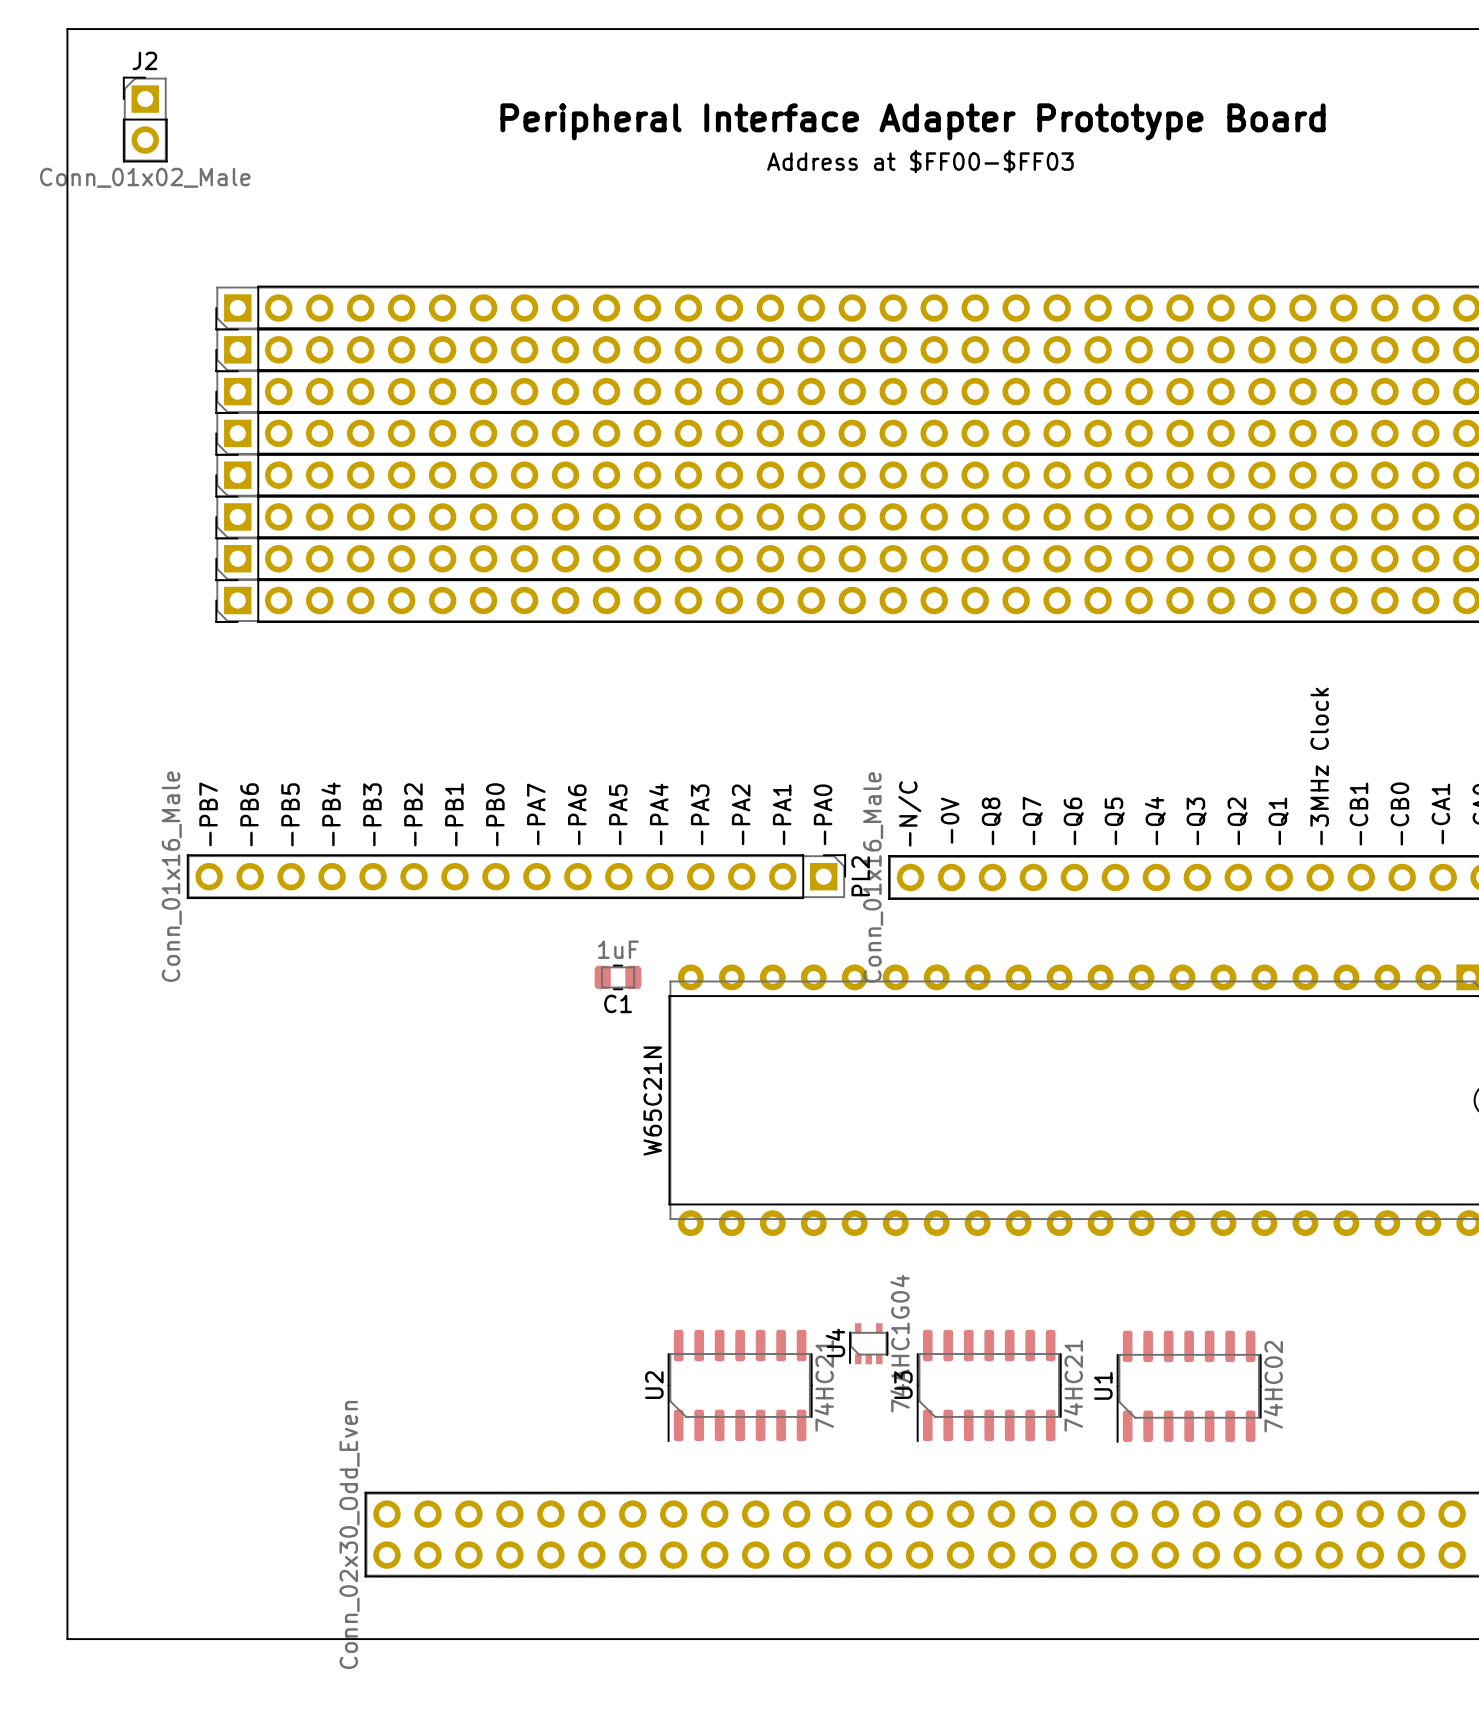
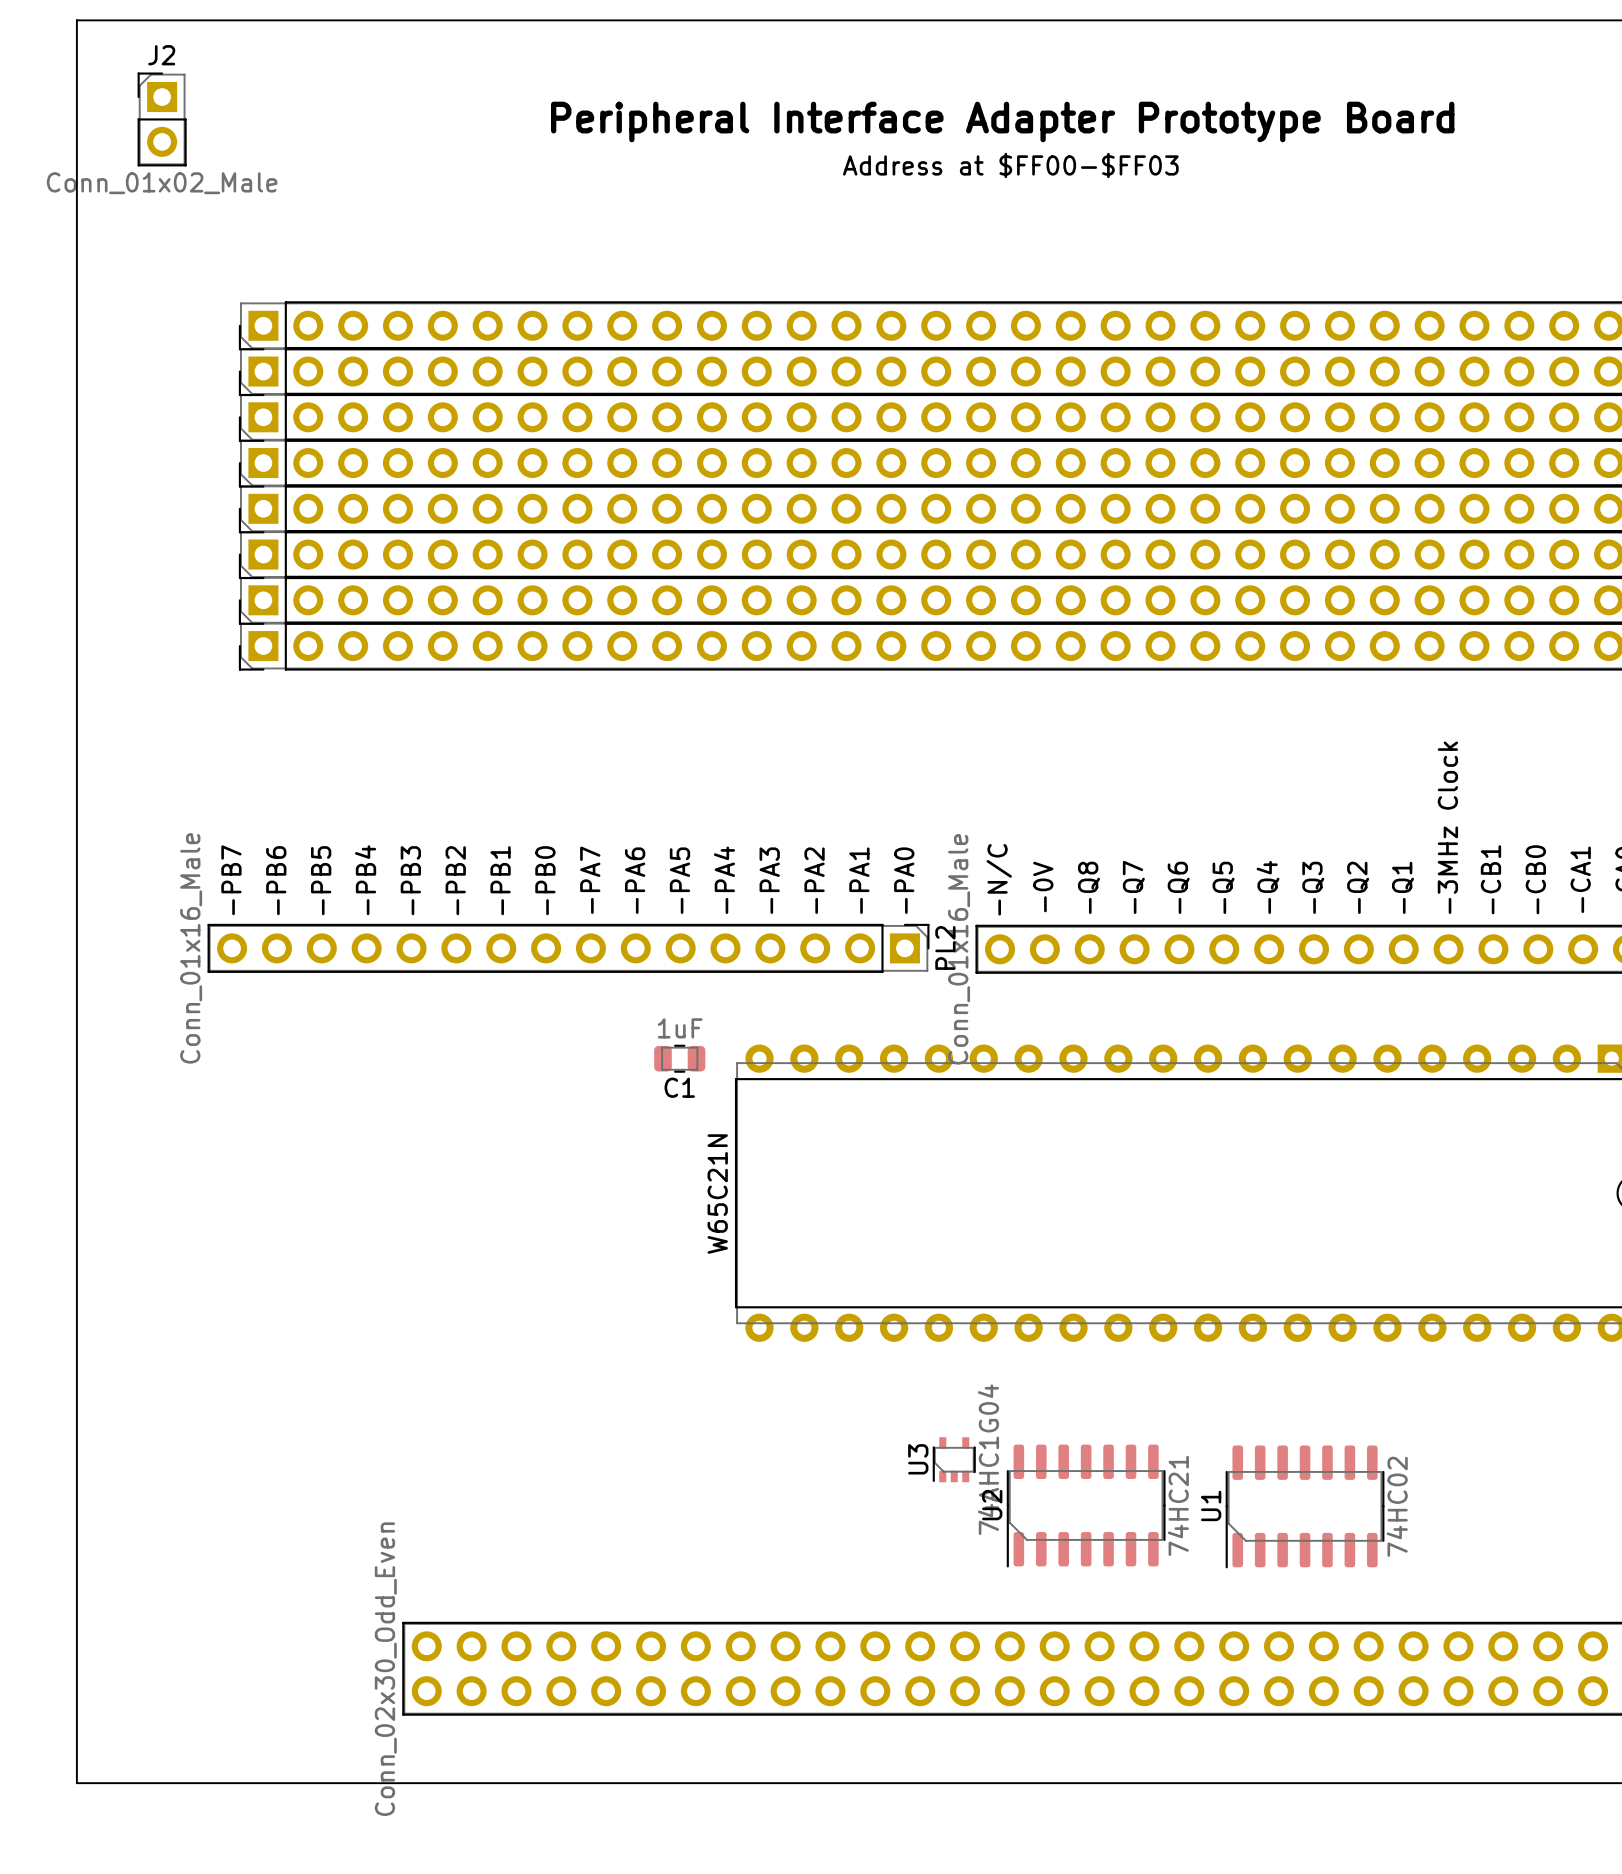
U4 name: U4 (835, 1342) -> U3 (918, 1459)
U2: 74HC21 (740, 1385) -> none
U3 name: U3 (903, 1385) -> U2 (992, 1505)

